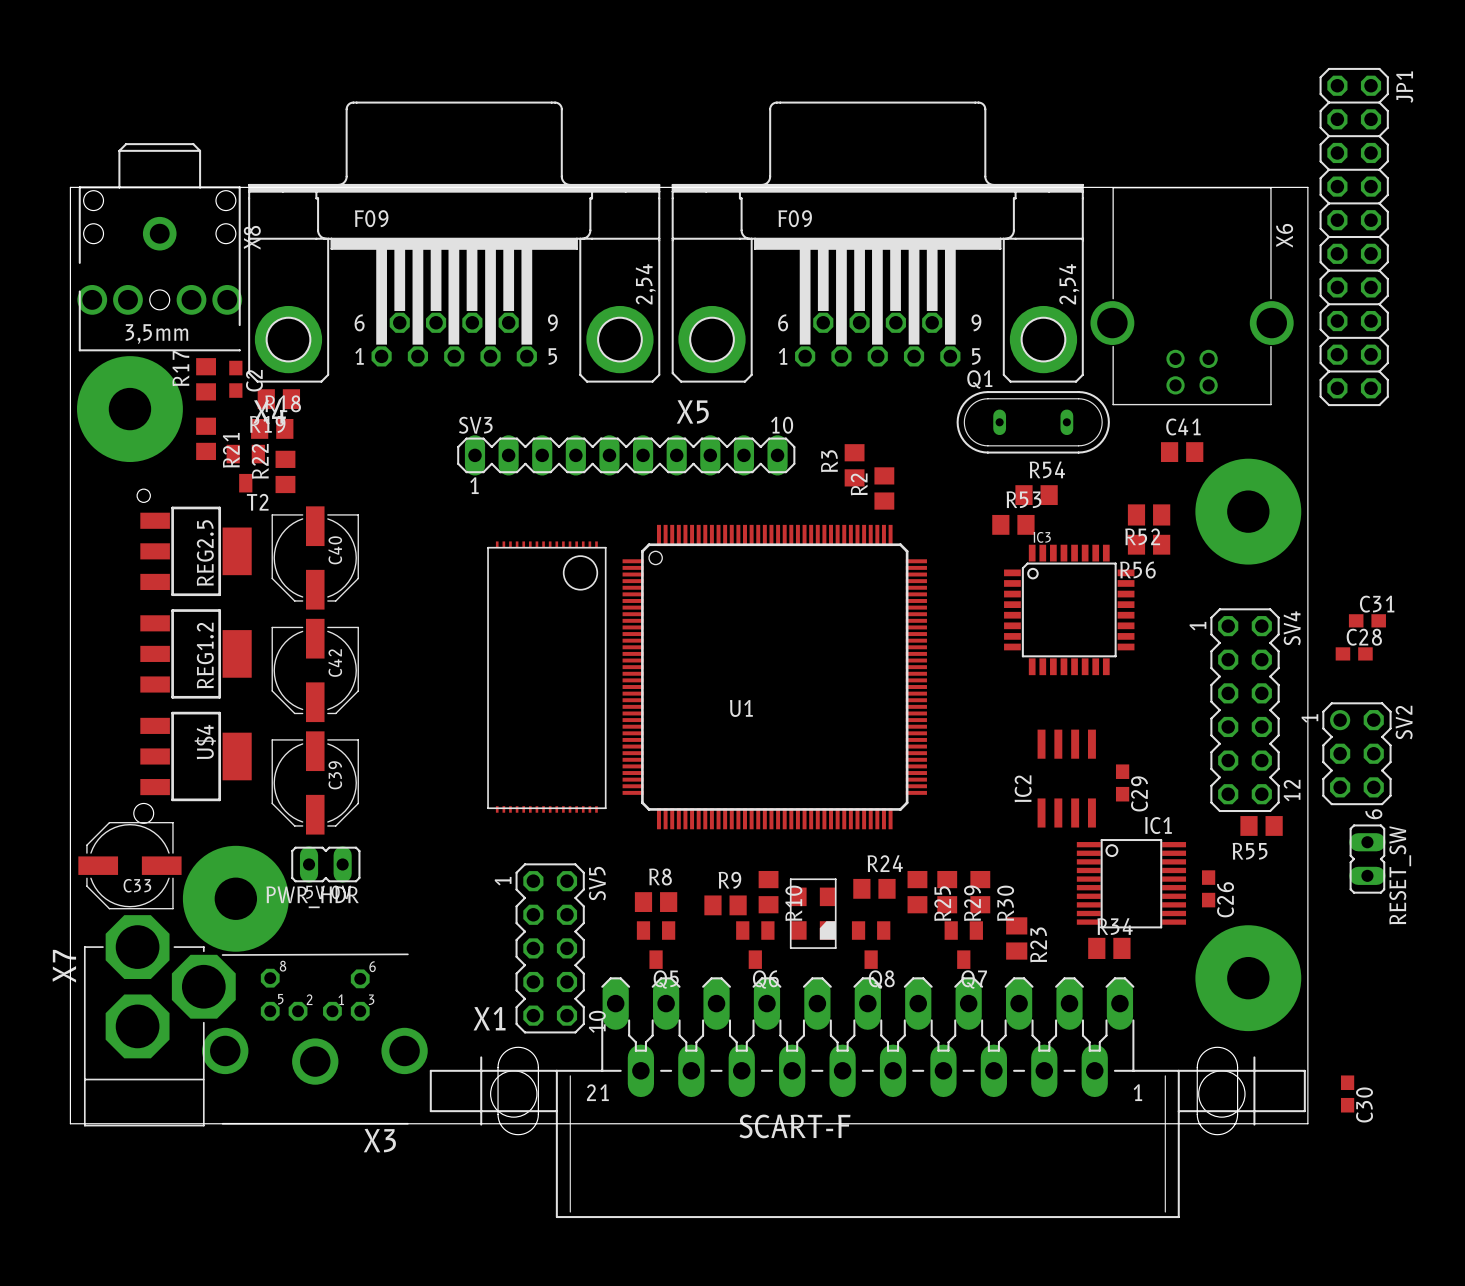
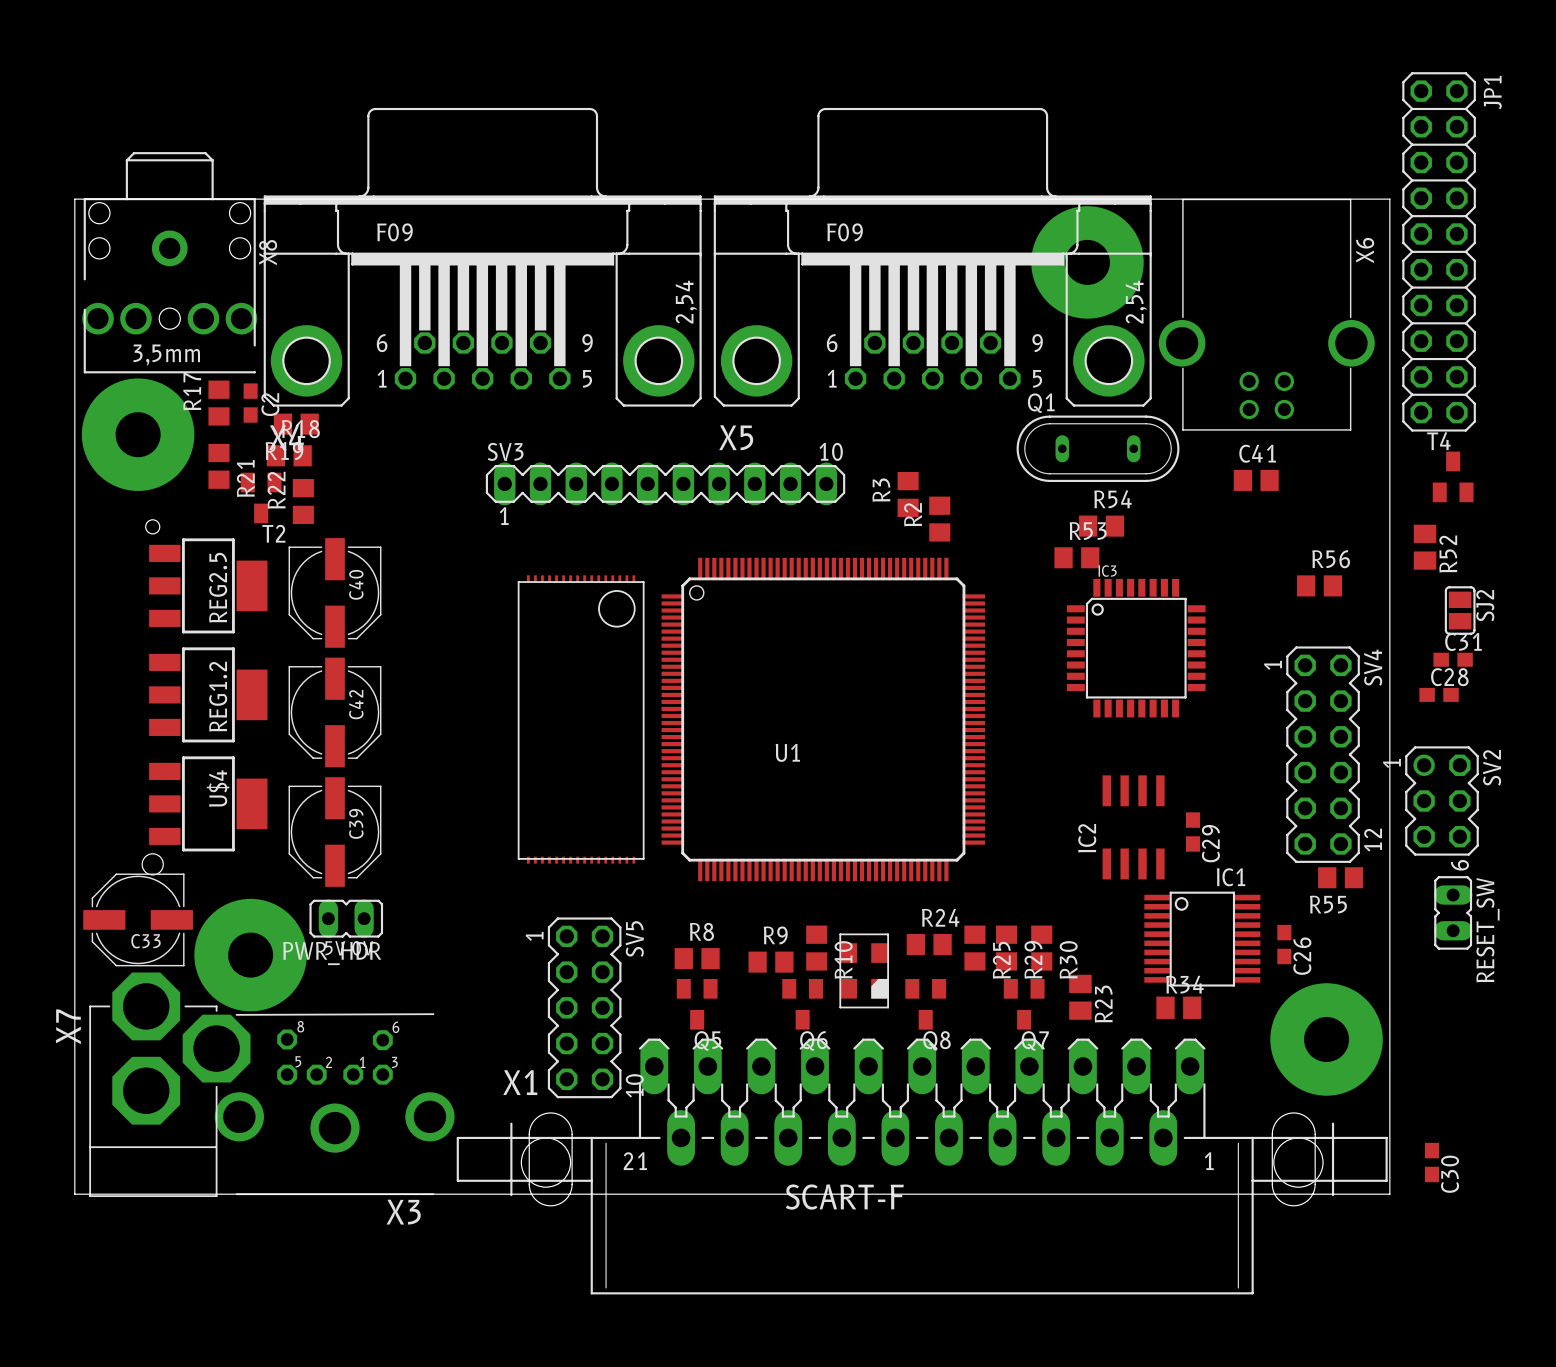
part: none -> (1087, 262)
T4: none -> (1453, 476)
part: (1248, 511) -> none
R52 rotation: 0° (1149, 514) -> 90° clockwise (1425, 547)
R52 position: (1149, 514) -> (1425, 547)
R52 name position: R52 (1142, 536) -> R52 (1448, 554)
R56 position: (1149, 544) -> (1319, 585)
R56 name position: R56 (1137, 570) -> R56 (1331, 559)
SJ2: none -> (1460, 610)

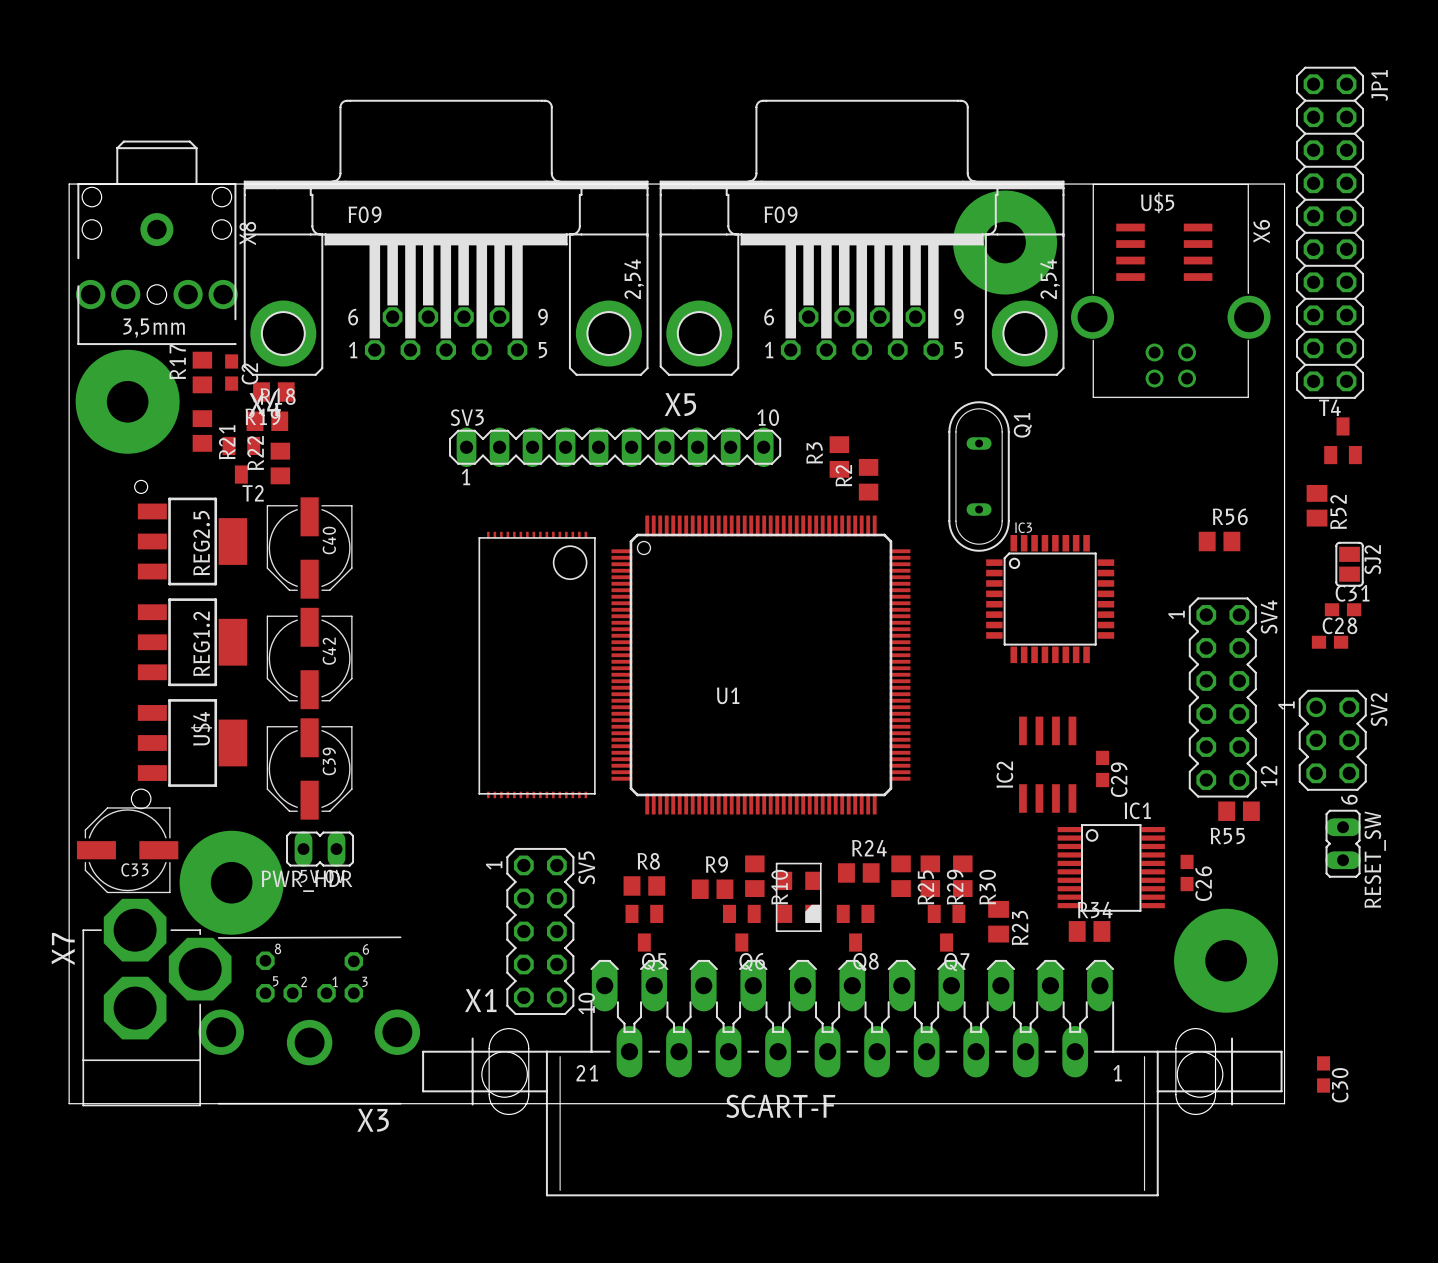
U$5: none -> (1164, 252)
Q1 rotation: 0° (1098, 448) -> 90° clockwise (979, 476)
C41: (1256, 480) -> none
R54: (1101, 526) -> none
R53: (1076, 557) -> none

